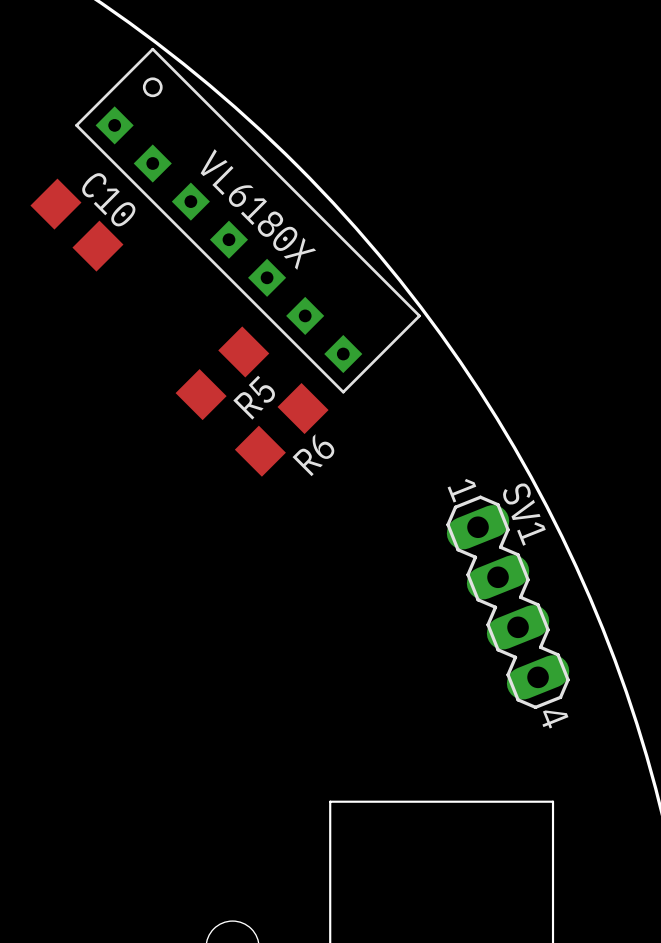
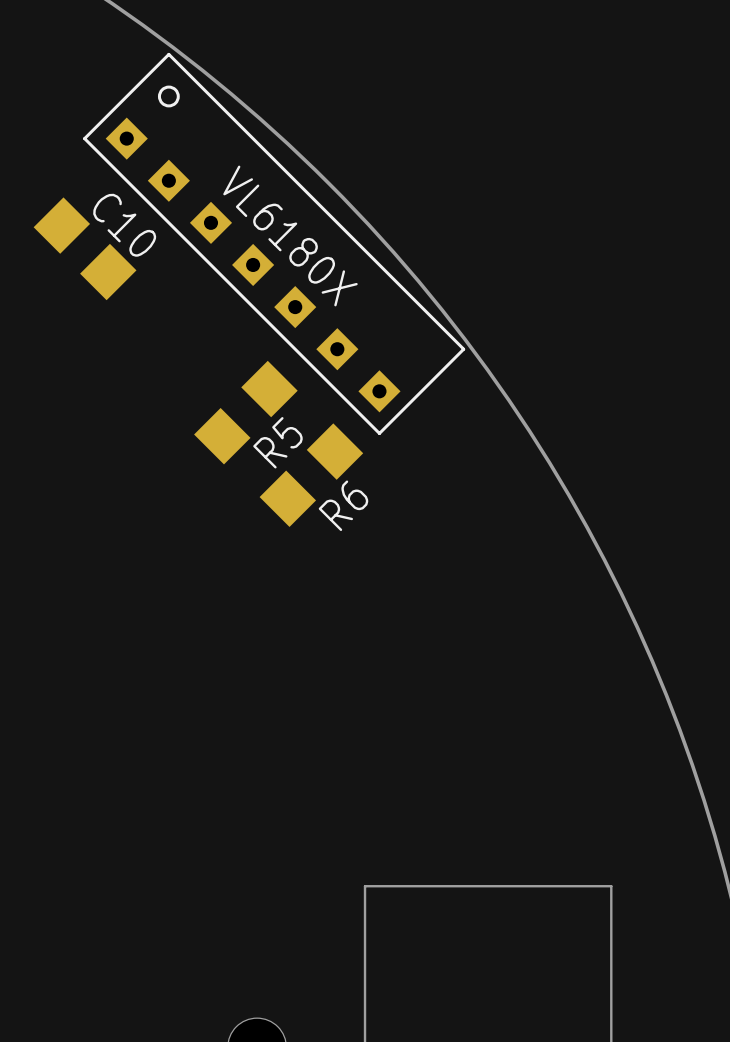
SV1: (508, 602) -> none

